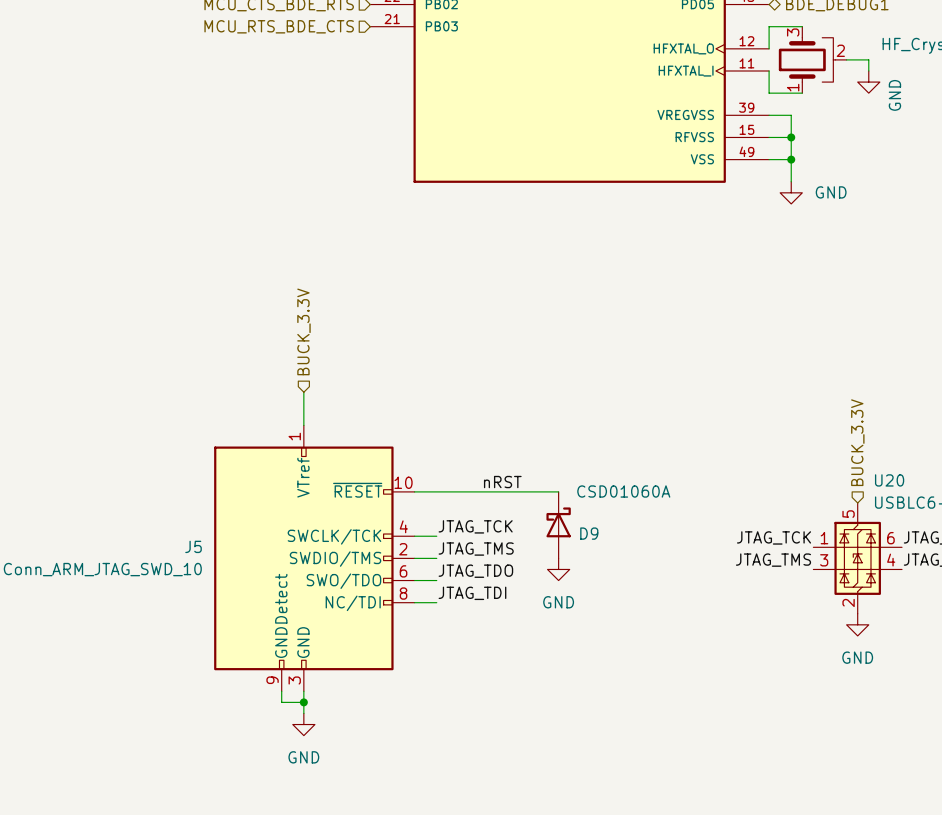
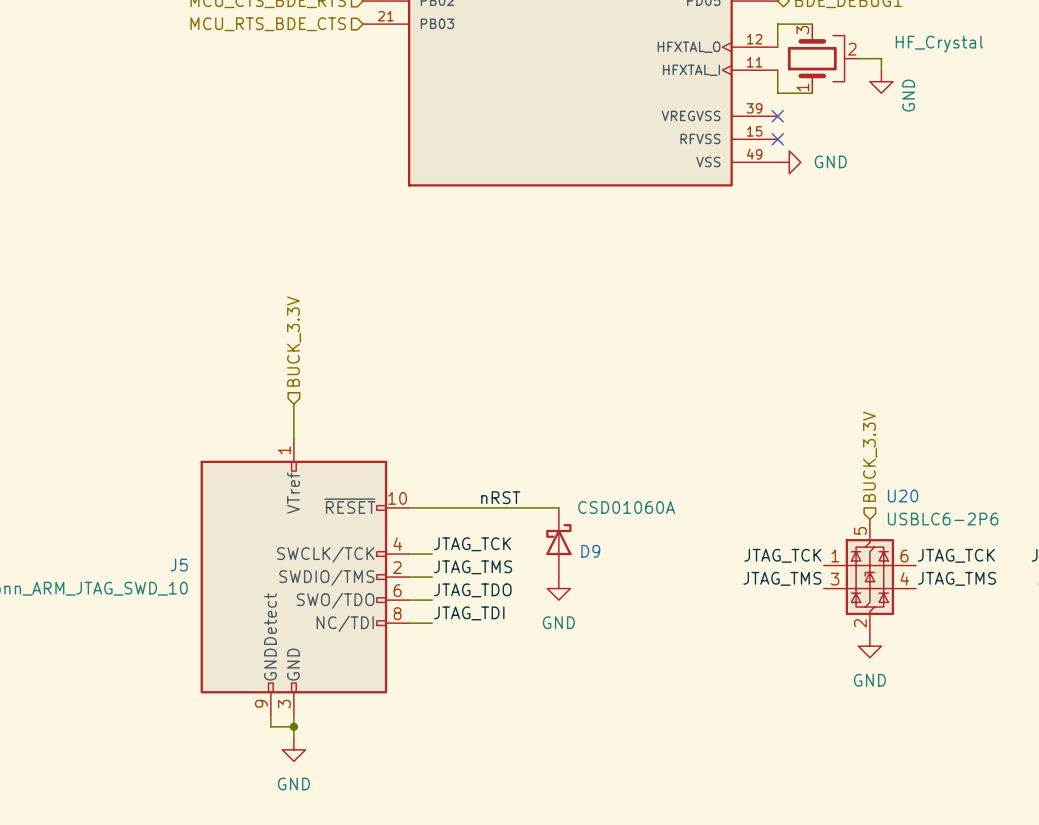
wire: (769, 115) (791, 115) (791, 181) -> none
no-connect mark: none -> (777, 116)
wire: (769, 137) (791, 137) -> none
no-connect mark: none -> (777, 139)
junction: (791, 137) -> none
junction: (791, 159) -> none
power symbol rotation: 0° (791, 192) -> 90° counterclockwise (789, 162)
power symbol position: GND (791, 192) -> GND (789, 162)

